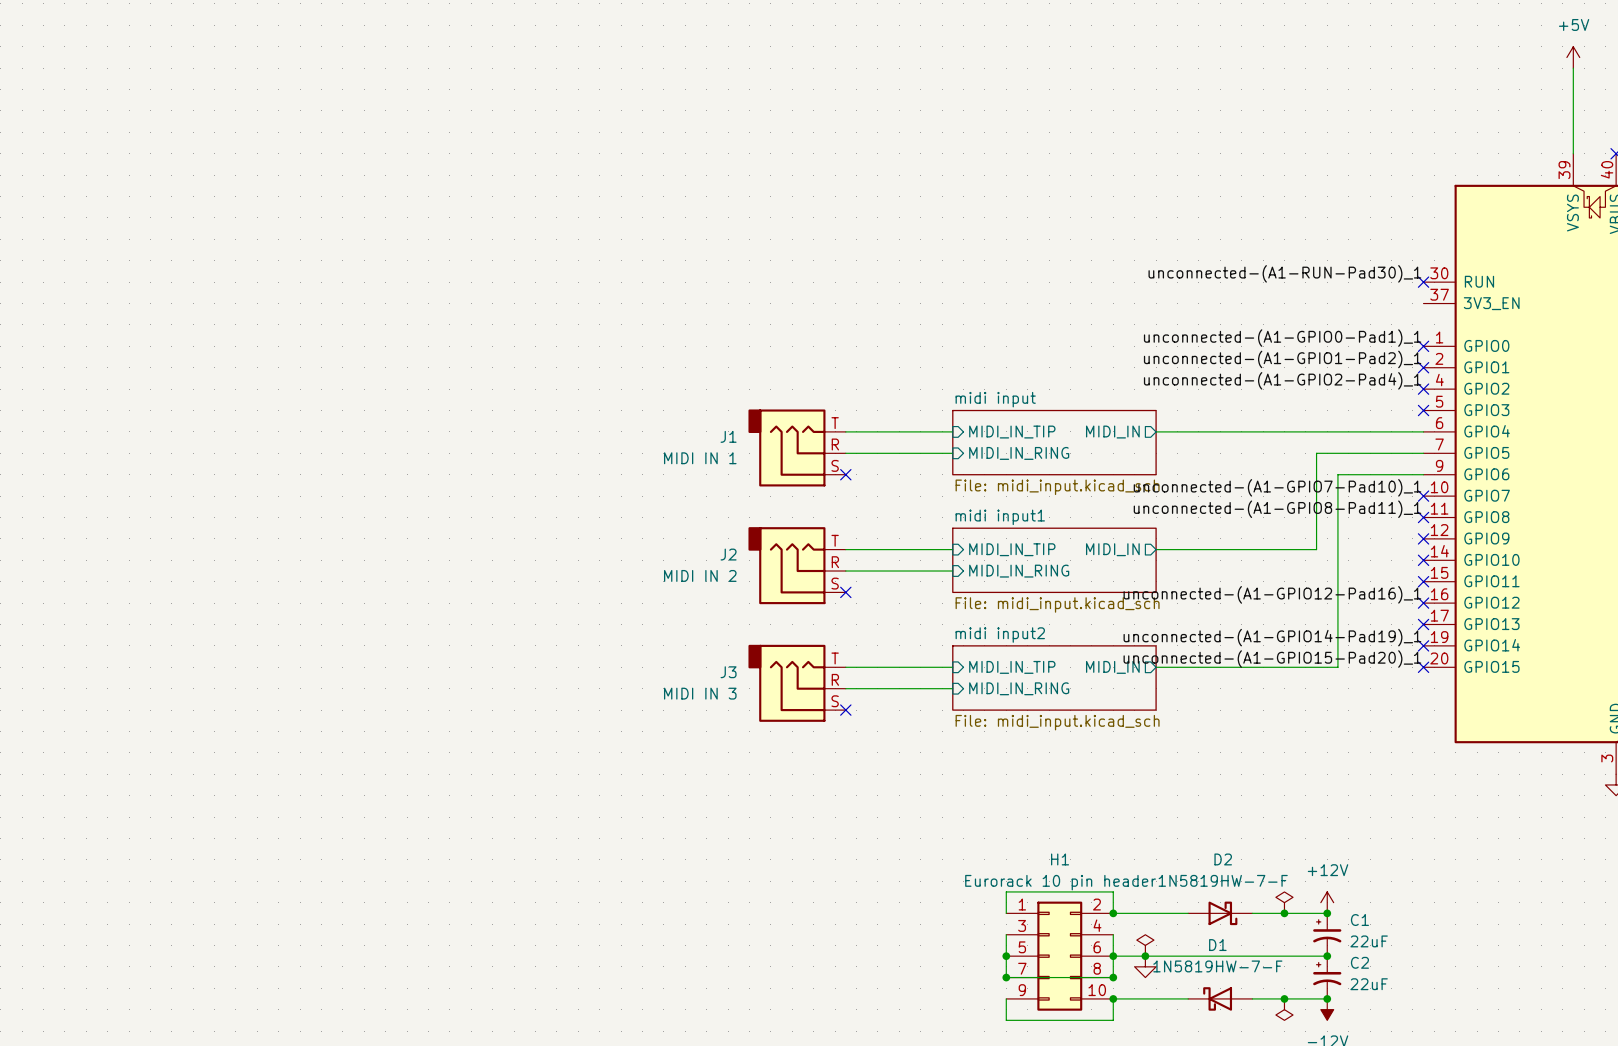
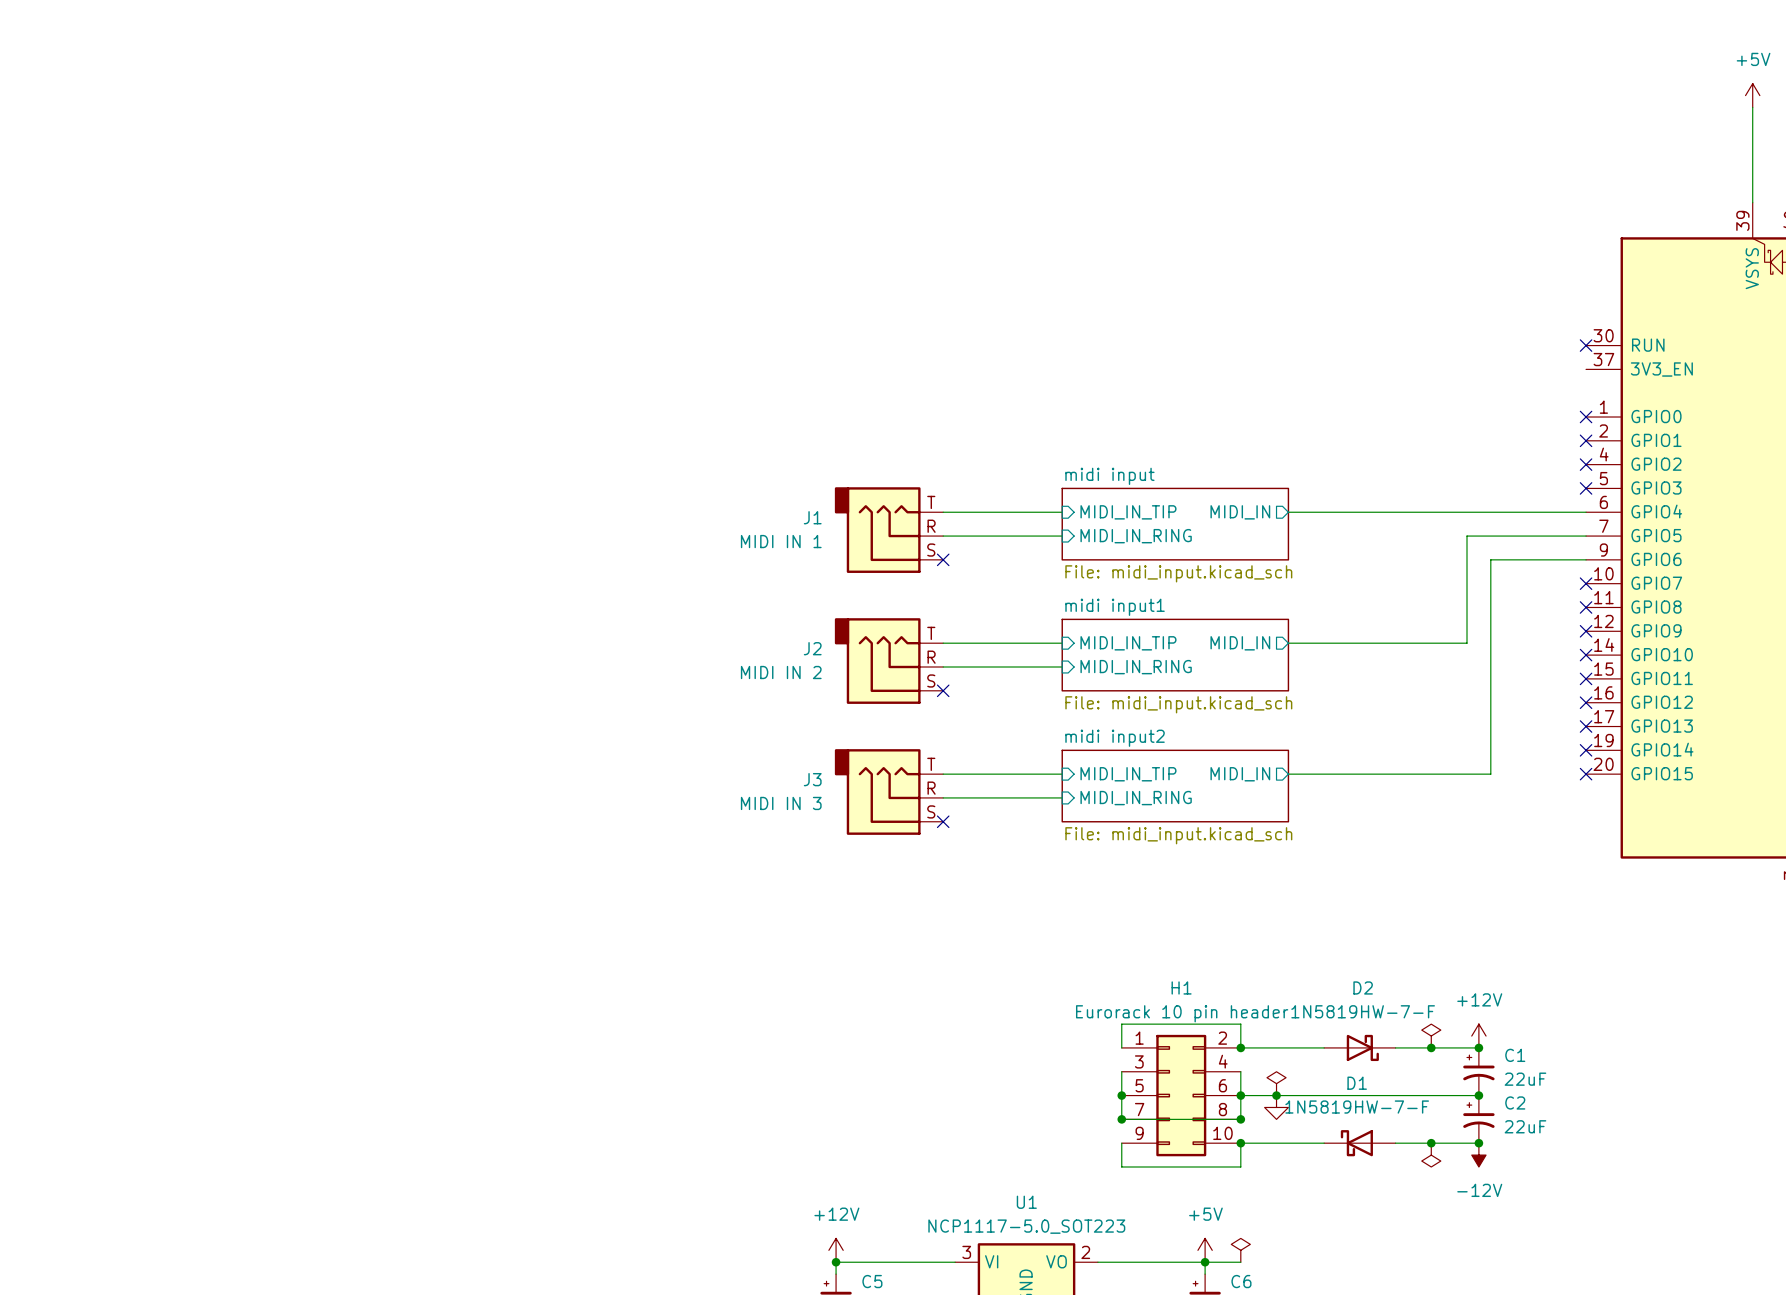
label: unconnected-(A1-RUN-Pad30)_1 (1284, 273) -> none
label: unconnected-(A1-GPIO0-Pad1)_1 (1282, 338) -> none
label: unconnected-(A1-GPIO1-Pad2)_1 (1282, 359) -> none
label: unconnected-(A1-GPIO2-Pad4)_1 (1282, 380) -> none
label: unconnected-(A1-GPIO7-Pad10)_1 (1277, 487) -> none
label: unconnected-(A1-GPIO8-Pad11)_1 (1277, 509) -> none
label: unconnected-(A1-GPIO12-Pad16)_1 (1272, 594) -> none
label: unconnected-(A1-GPIO14-Pad19)_1 (1272, 637) -> none
label: unconnected-(A1-GPIO15-Pad20)_1 (1272, 659) -> none

